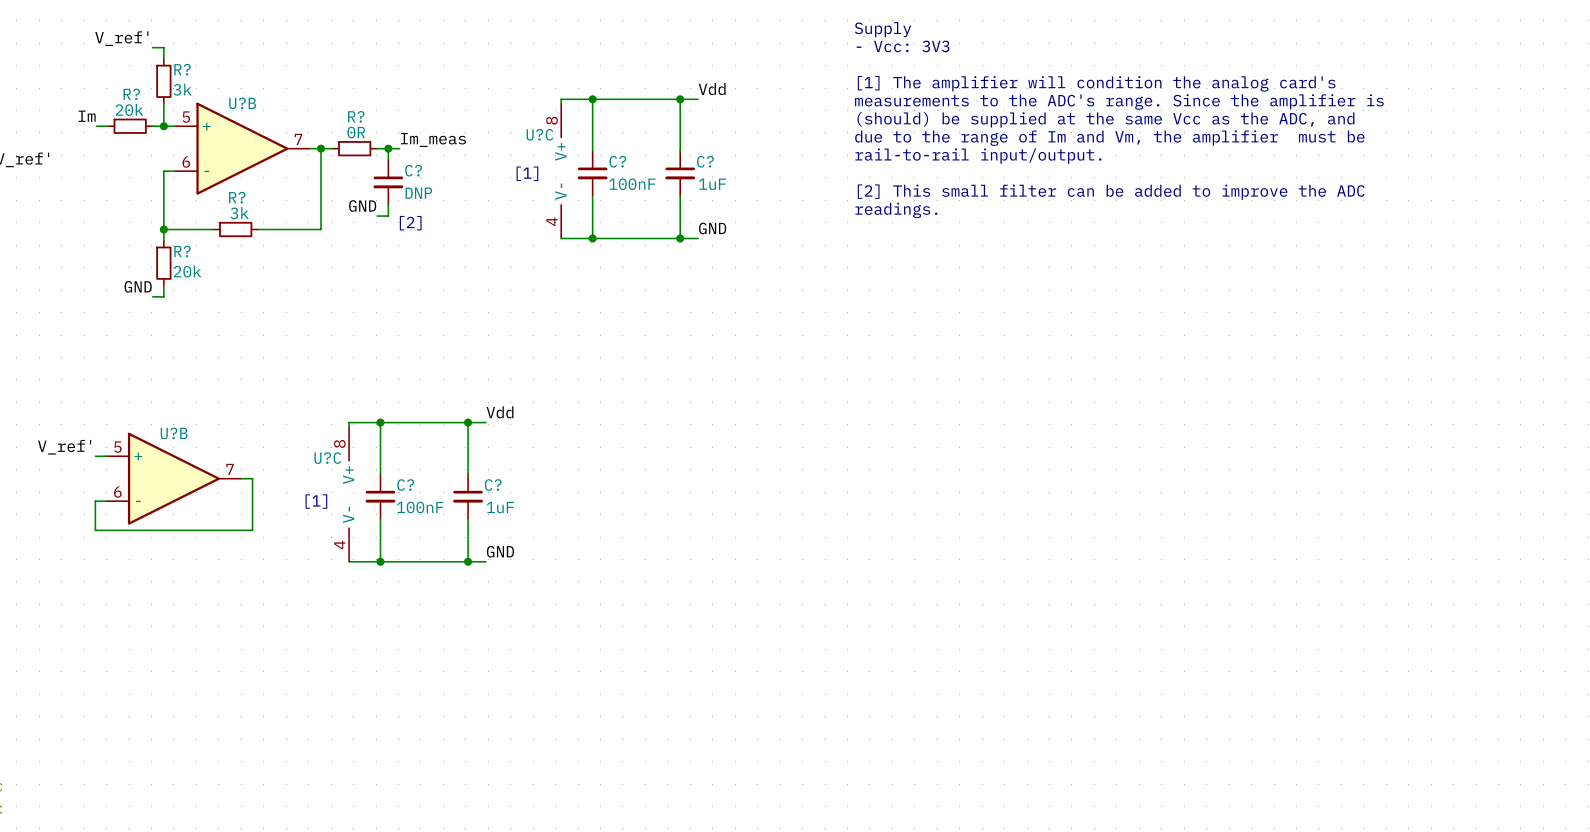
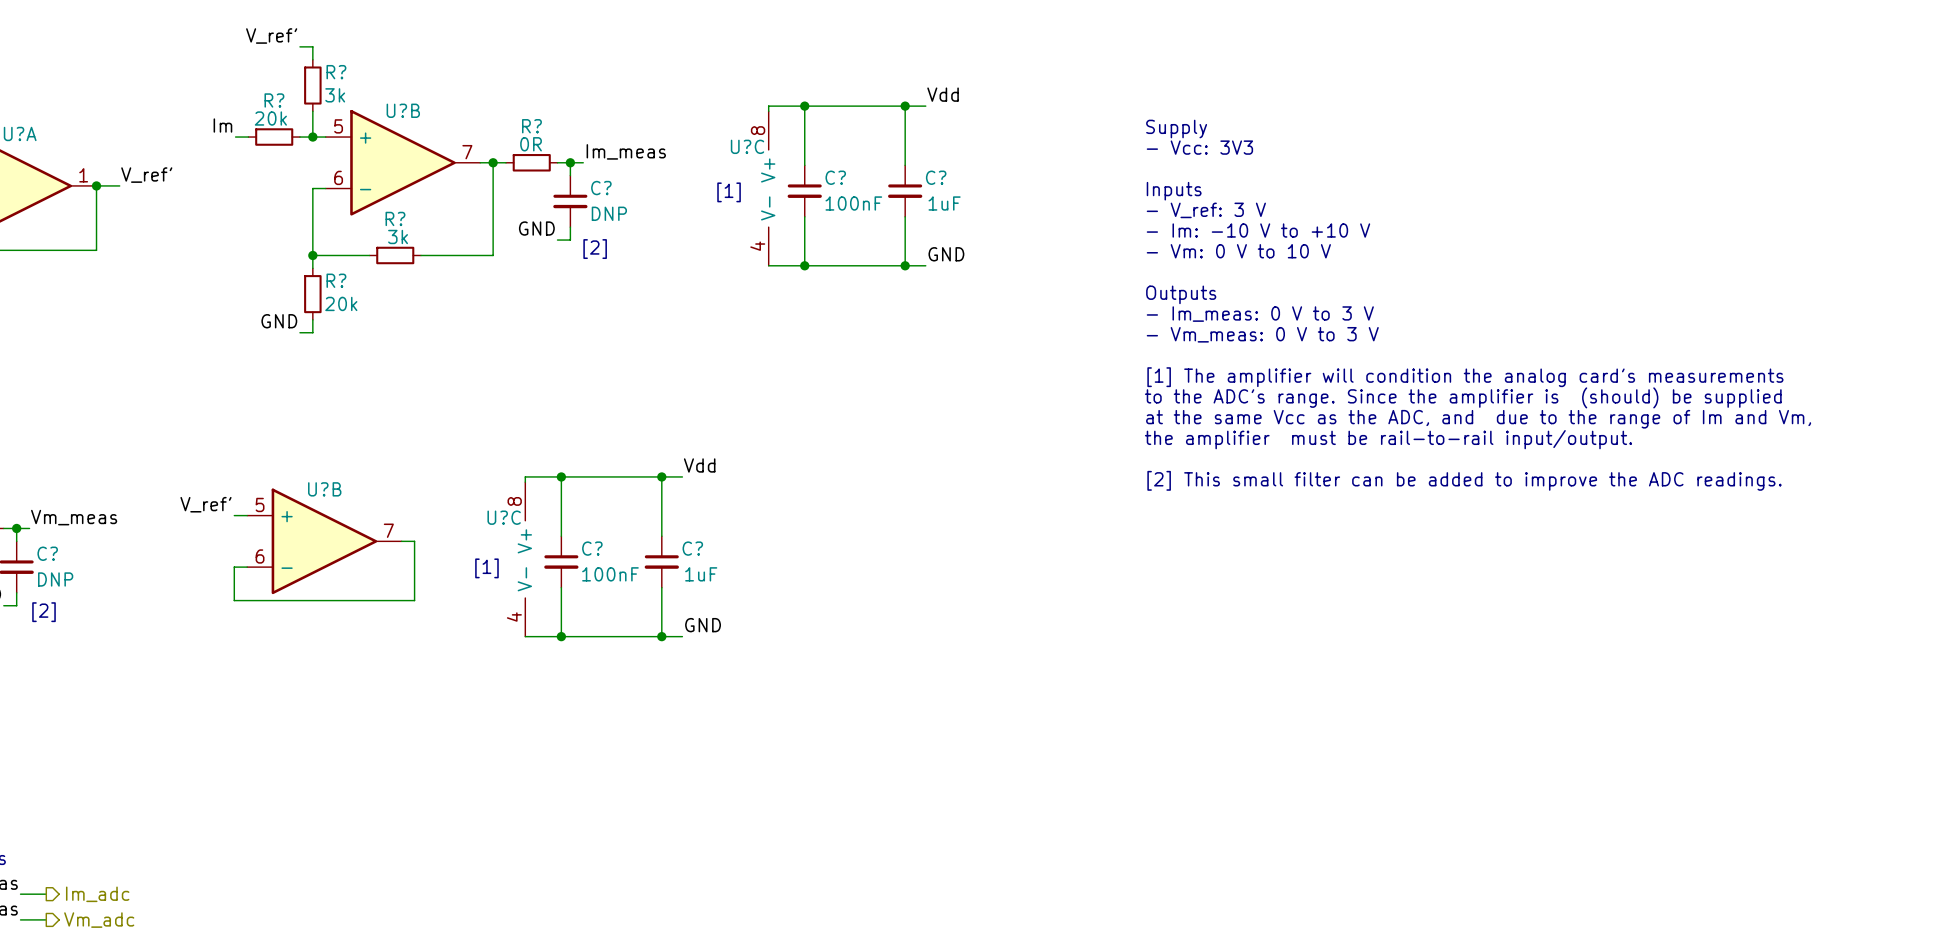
text position: Supply (883, 29) -> Supply (1176, 129)
text position: - Vcc: 3V3 (903, 46) -> - Vcc: 3V3 (1199, 147)
text: [1] The amplifier will condition the analog card's (1096, 83) -> none
text: measurements to the ADC's range. Since the amplifier is (1119, 101) -> none
text: (should) be supplied at the same Vcc as the ADC, and (1105, 119) -> none
text: due to the range of Im and Vm, the amplifier must be (1109, 138) -> none
text: rail-to-rail input/output. (978, 155) -> none
text: none -> Inputs (1174, 191)
text: none -> - V_ref: 3 V (1206, 210)
text: [2] This small filter can be added to improve the ADC (1111, 192) -> none
text: none -> - Im: -10 V to +10 V (1258, 230)
text: readings. (896, 210) -> none
text: none -> - Vm: 0 V to 10 V (1238, 251)
text: none -> Outputs (1181, 294)
text: none -> - Im_meas: 0 V to 3 V (1260, 314)
text: none -> - Vm_meas: 0 V to 3 V (1262, 334)
text: none -> [1] The amplifier will condition the analog card's measurements (1465, 377)
text: none -> to the ADC's range. Since the amplifier is (should) be supplied (1463, 397)
text: none -> at the same Vcc as the ADC, and due to the range of Im and Vm, (1478, 419)
text: none -> the amplifier must be rail-to-rail input/output. (1388, 439)
text: none -> [2] This small filter can be added to improve the ADC readings. (1464, 480)

